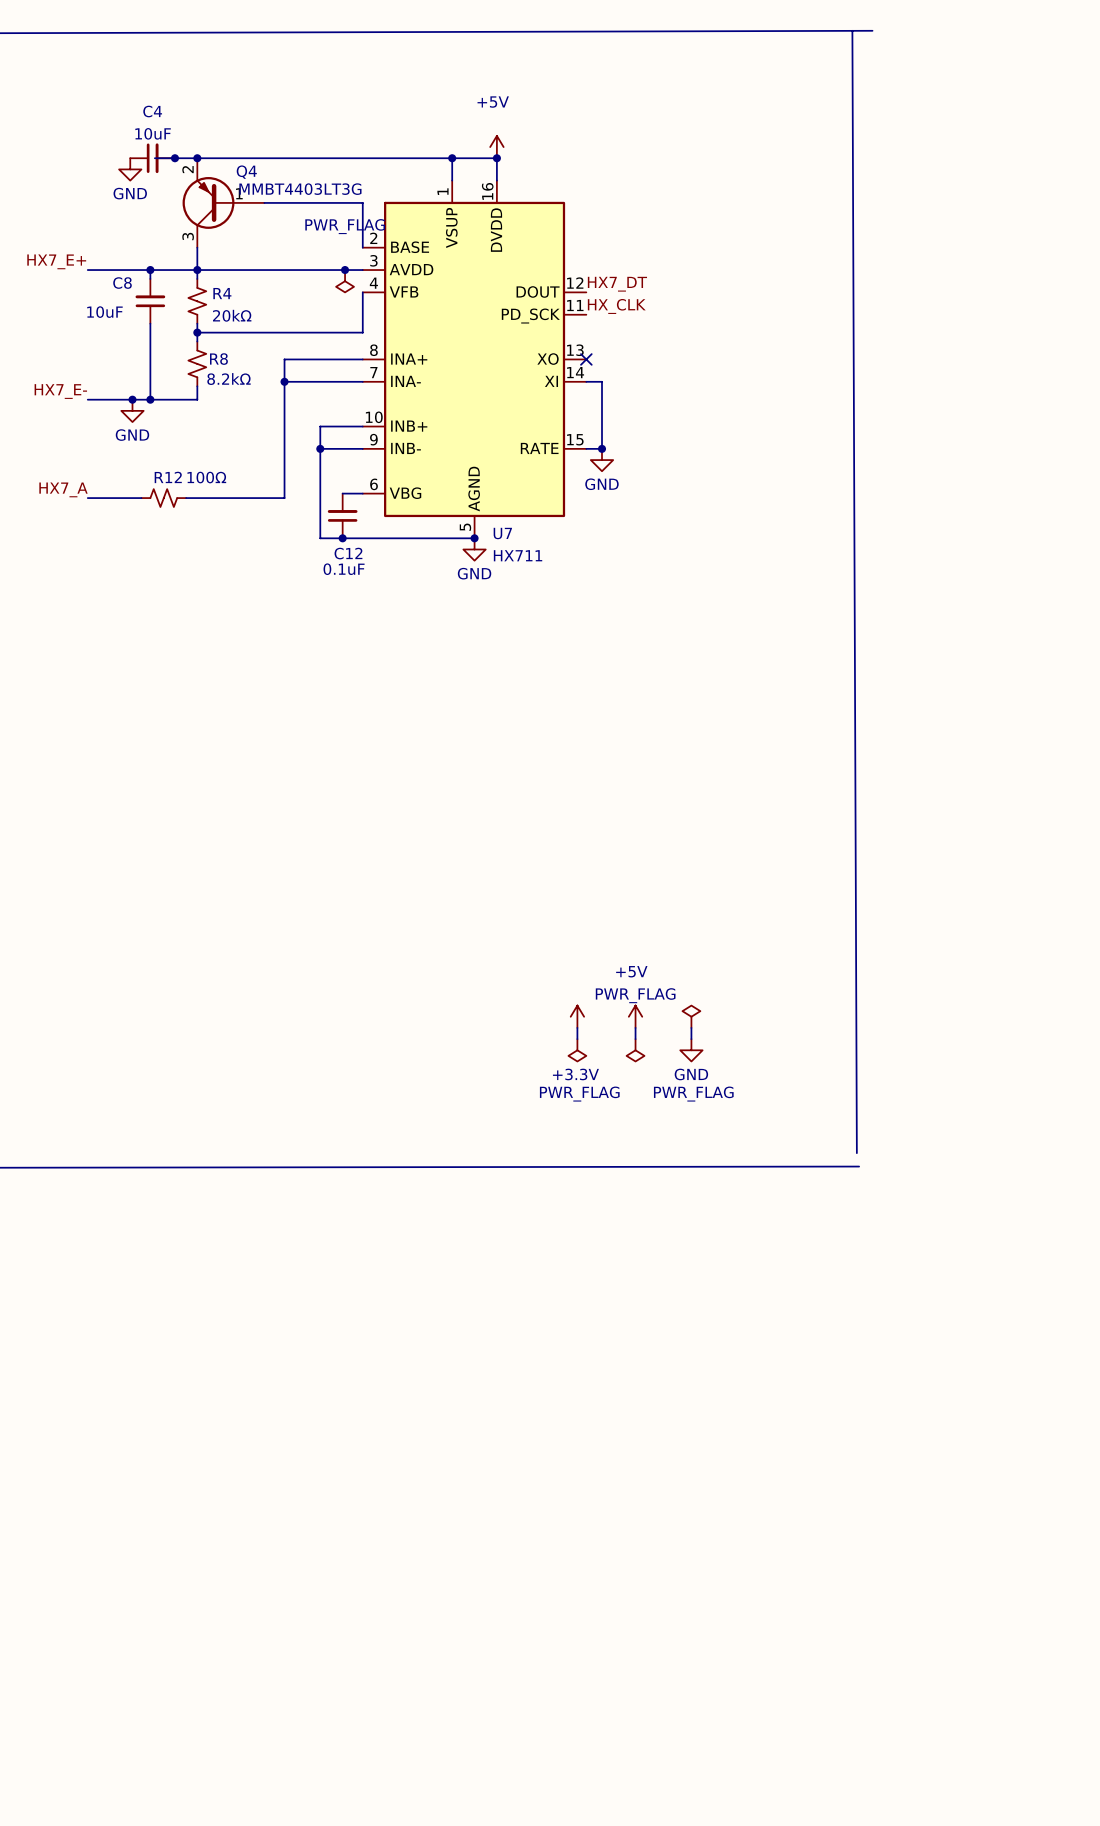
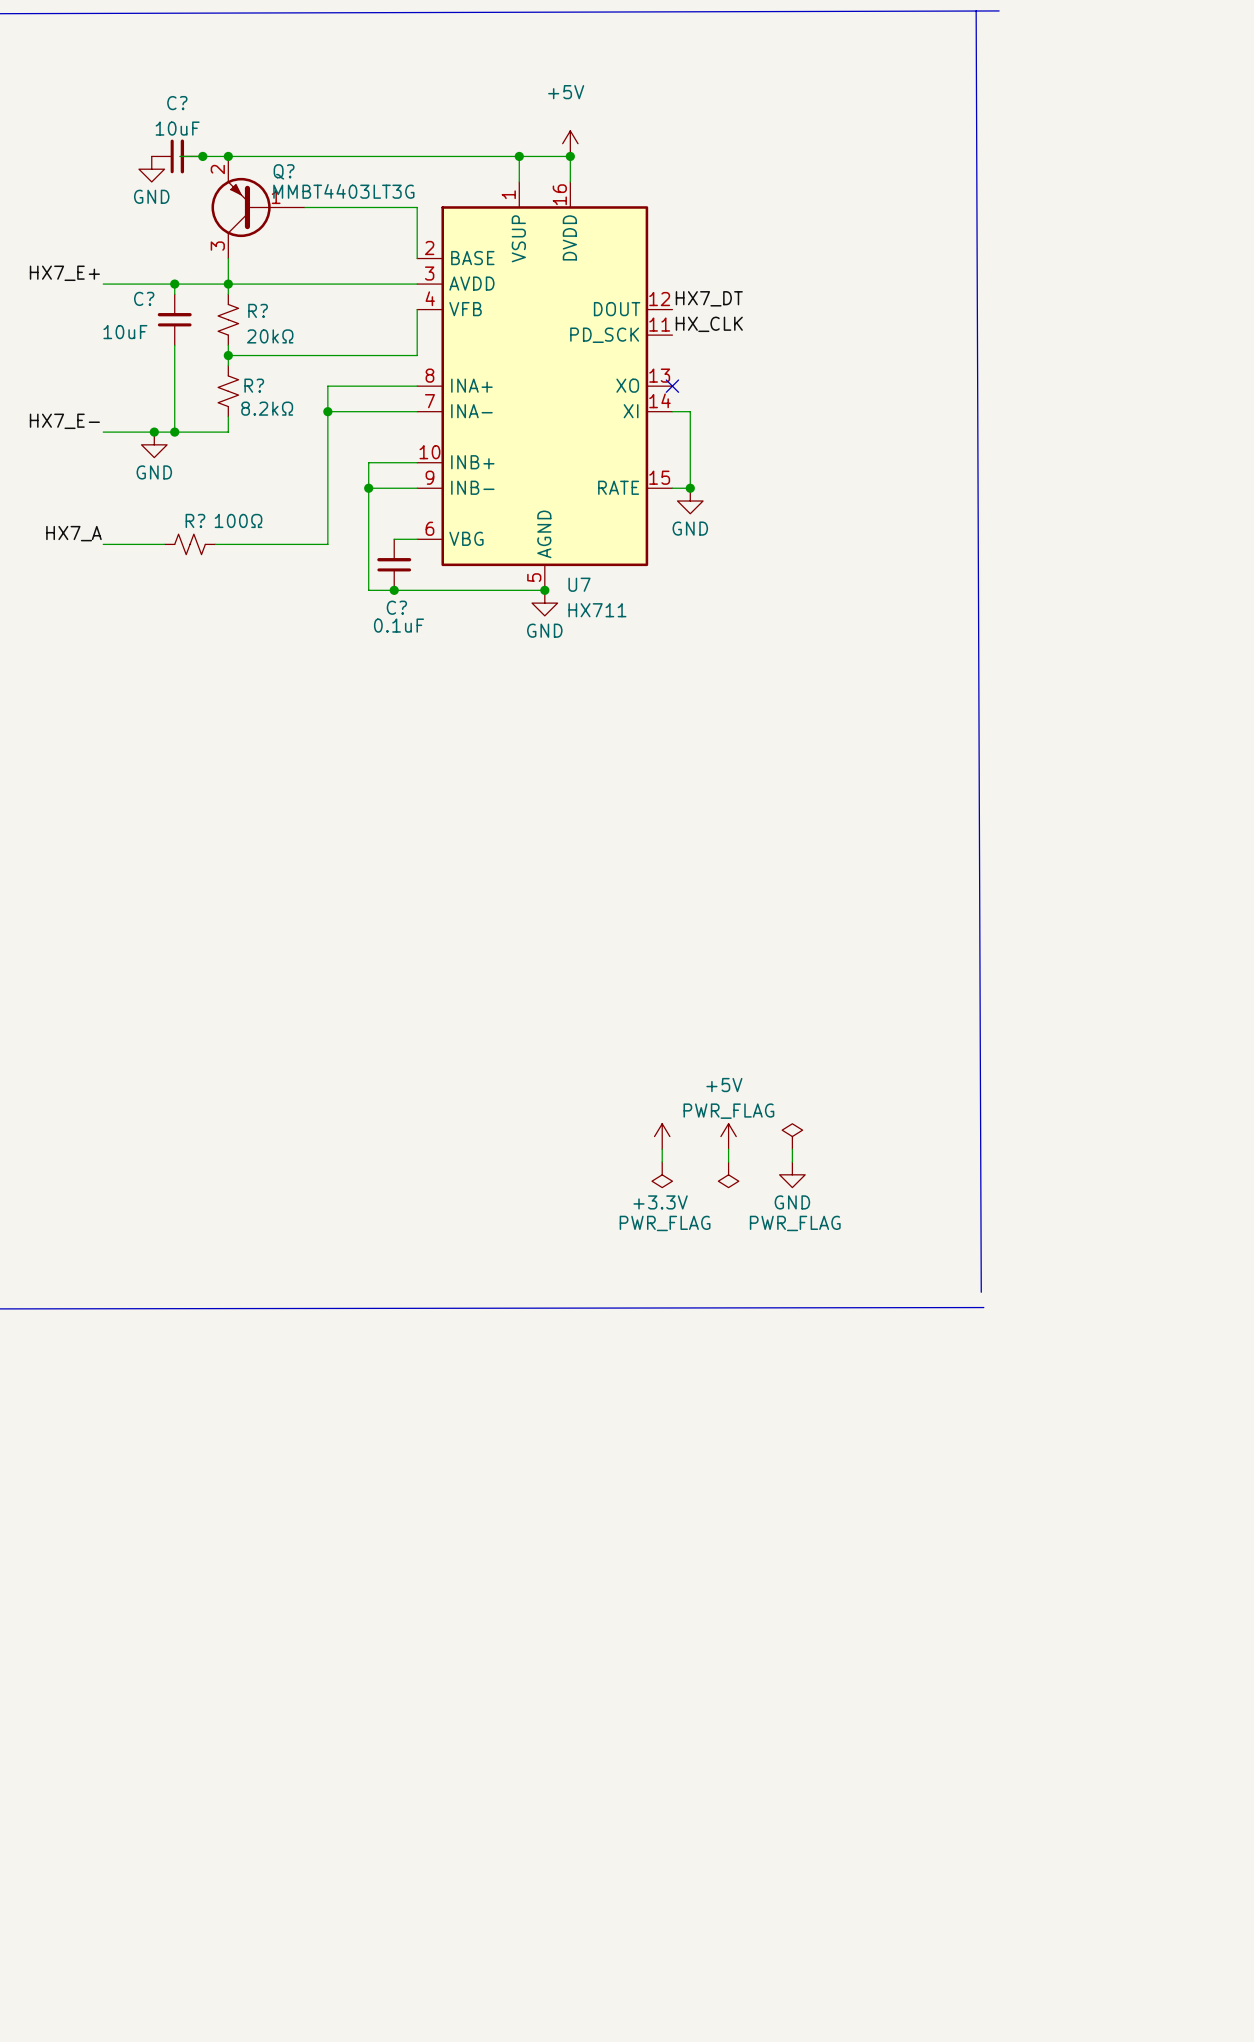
C4 name: C4 (152, 111) -> C? (177, 103)
Q4 name: Q4 (246, 172) -> Q? (284, 171)
junction: (345, 270) -> none
power symbol: PWR_FLAG (345, 281) -> none
C8 name: C8 (122, 283) -> C? (144, 298)
R4 name: R4 (222, 293) -> R? (258, 310)
R8 name: R8 (218, 359) -> R? (254, 385)
R12 name: R12 (168, 477) -> R? (195, 520)
C12 name: C12 (348, 553) -> C? (396, 607)

